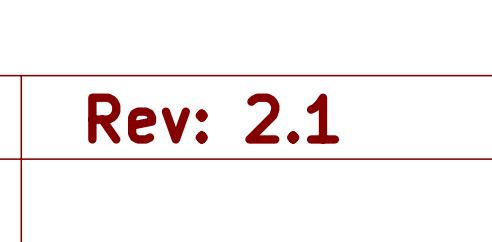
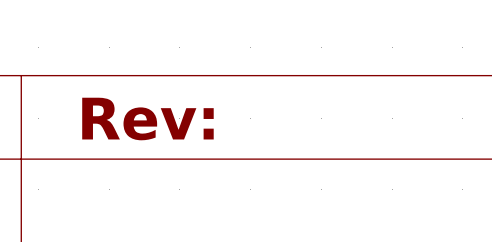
title block: Rev: 2.1 (213, 118) -> Rev: (147, 119)

